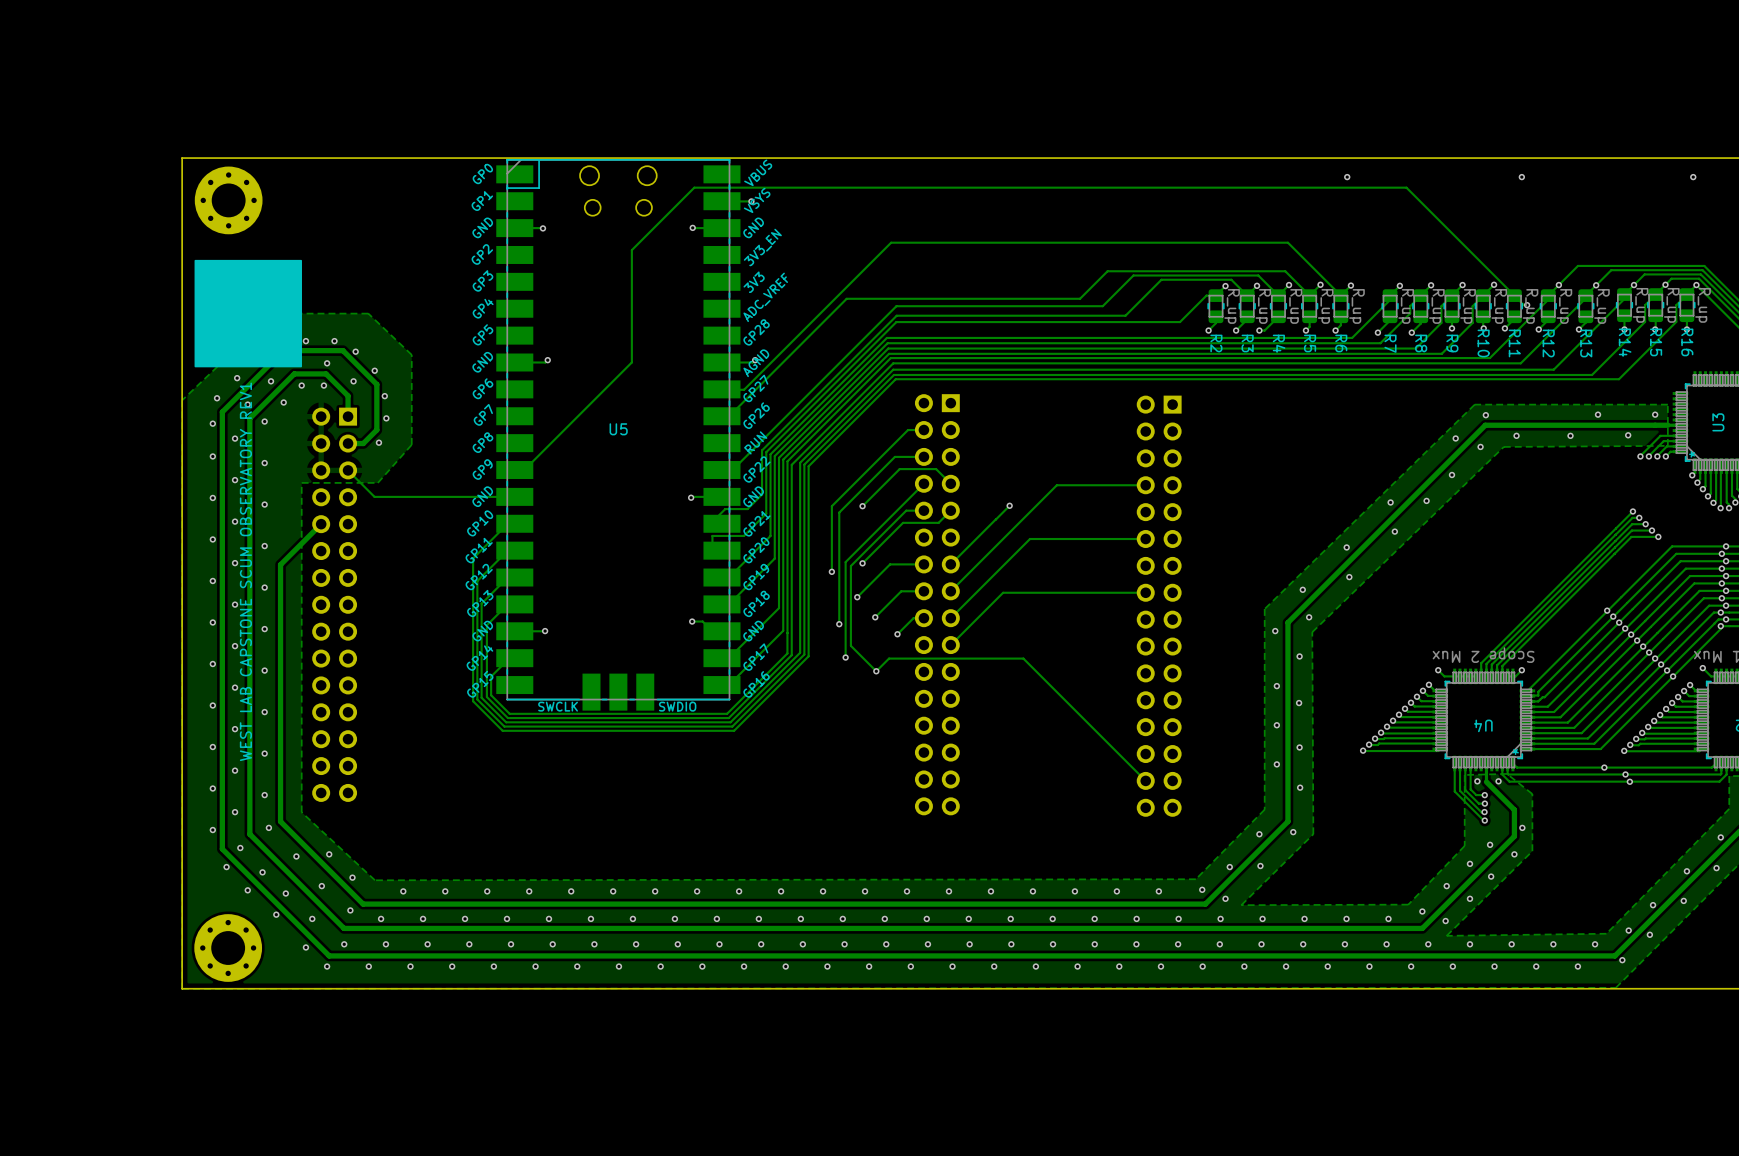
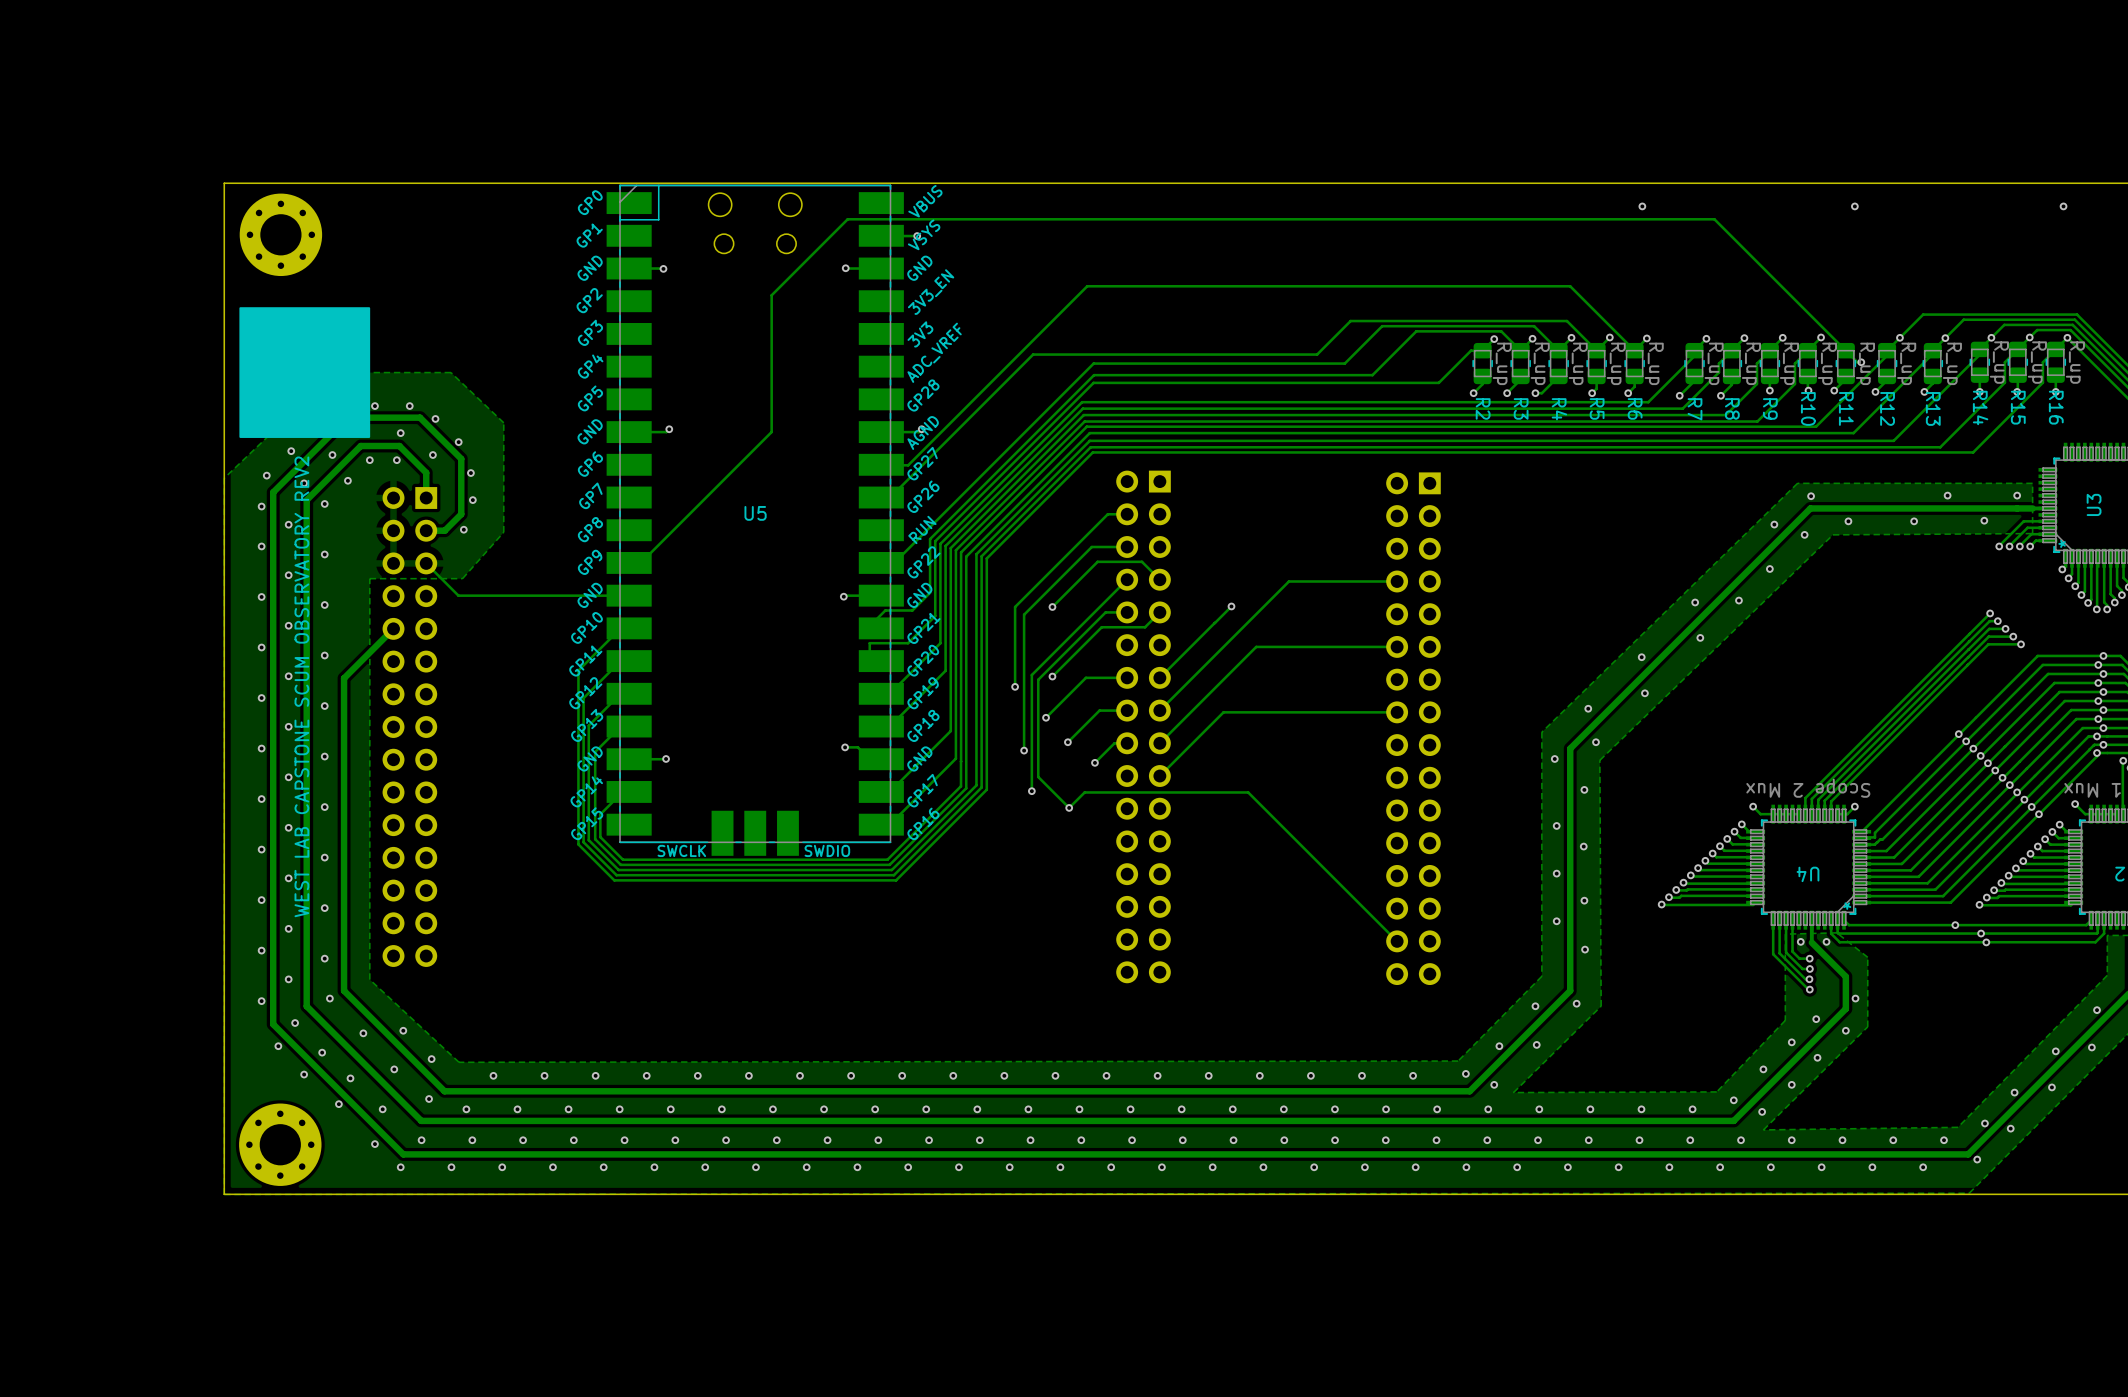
text: WEST LAB CAPSTONE SCUM OBSERVATORY REV1 (245, 571) -> WEST LAB CAPSTONE SCUM OBSERVATORY REV2 (301, 686)

